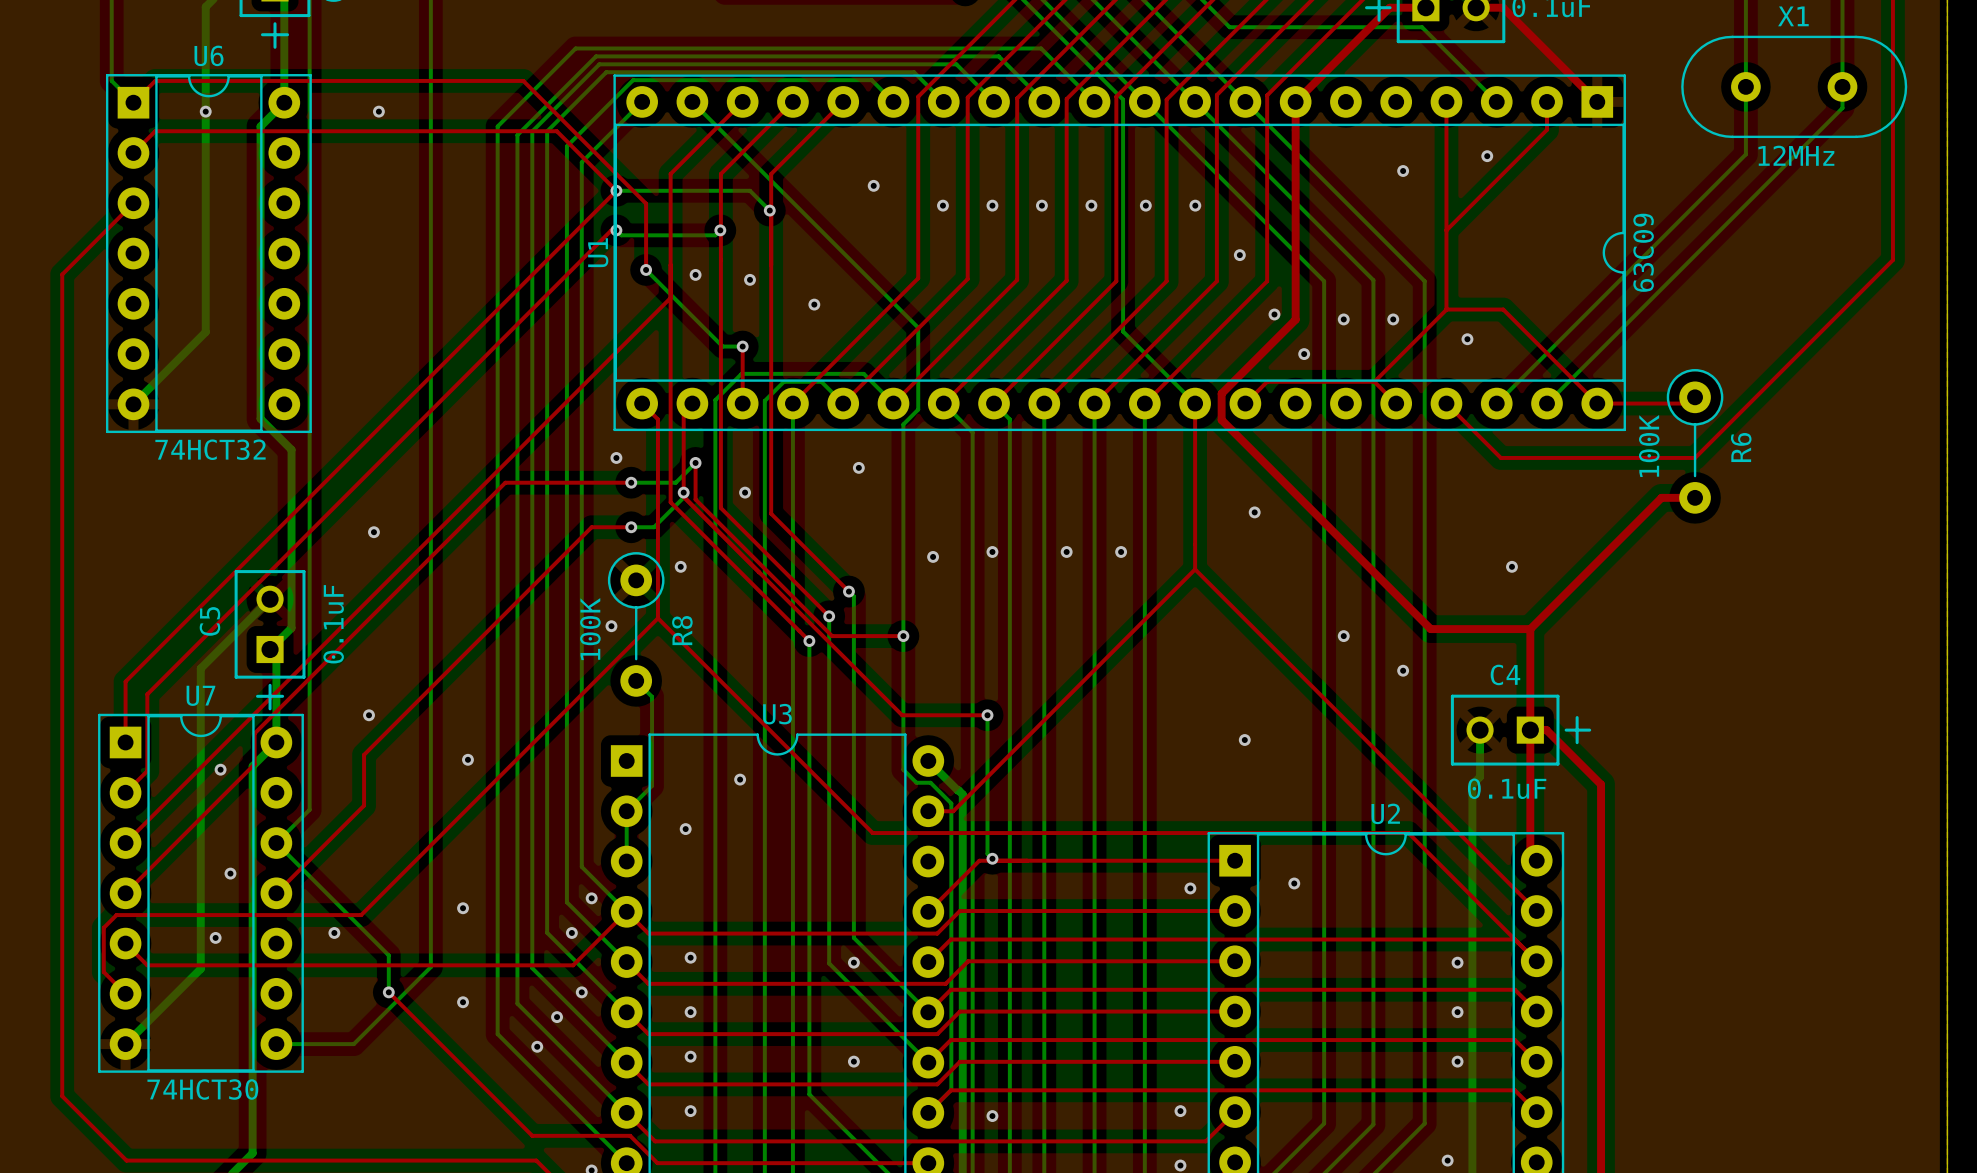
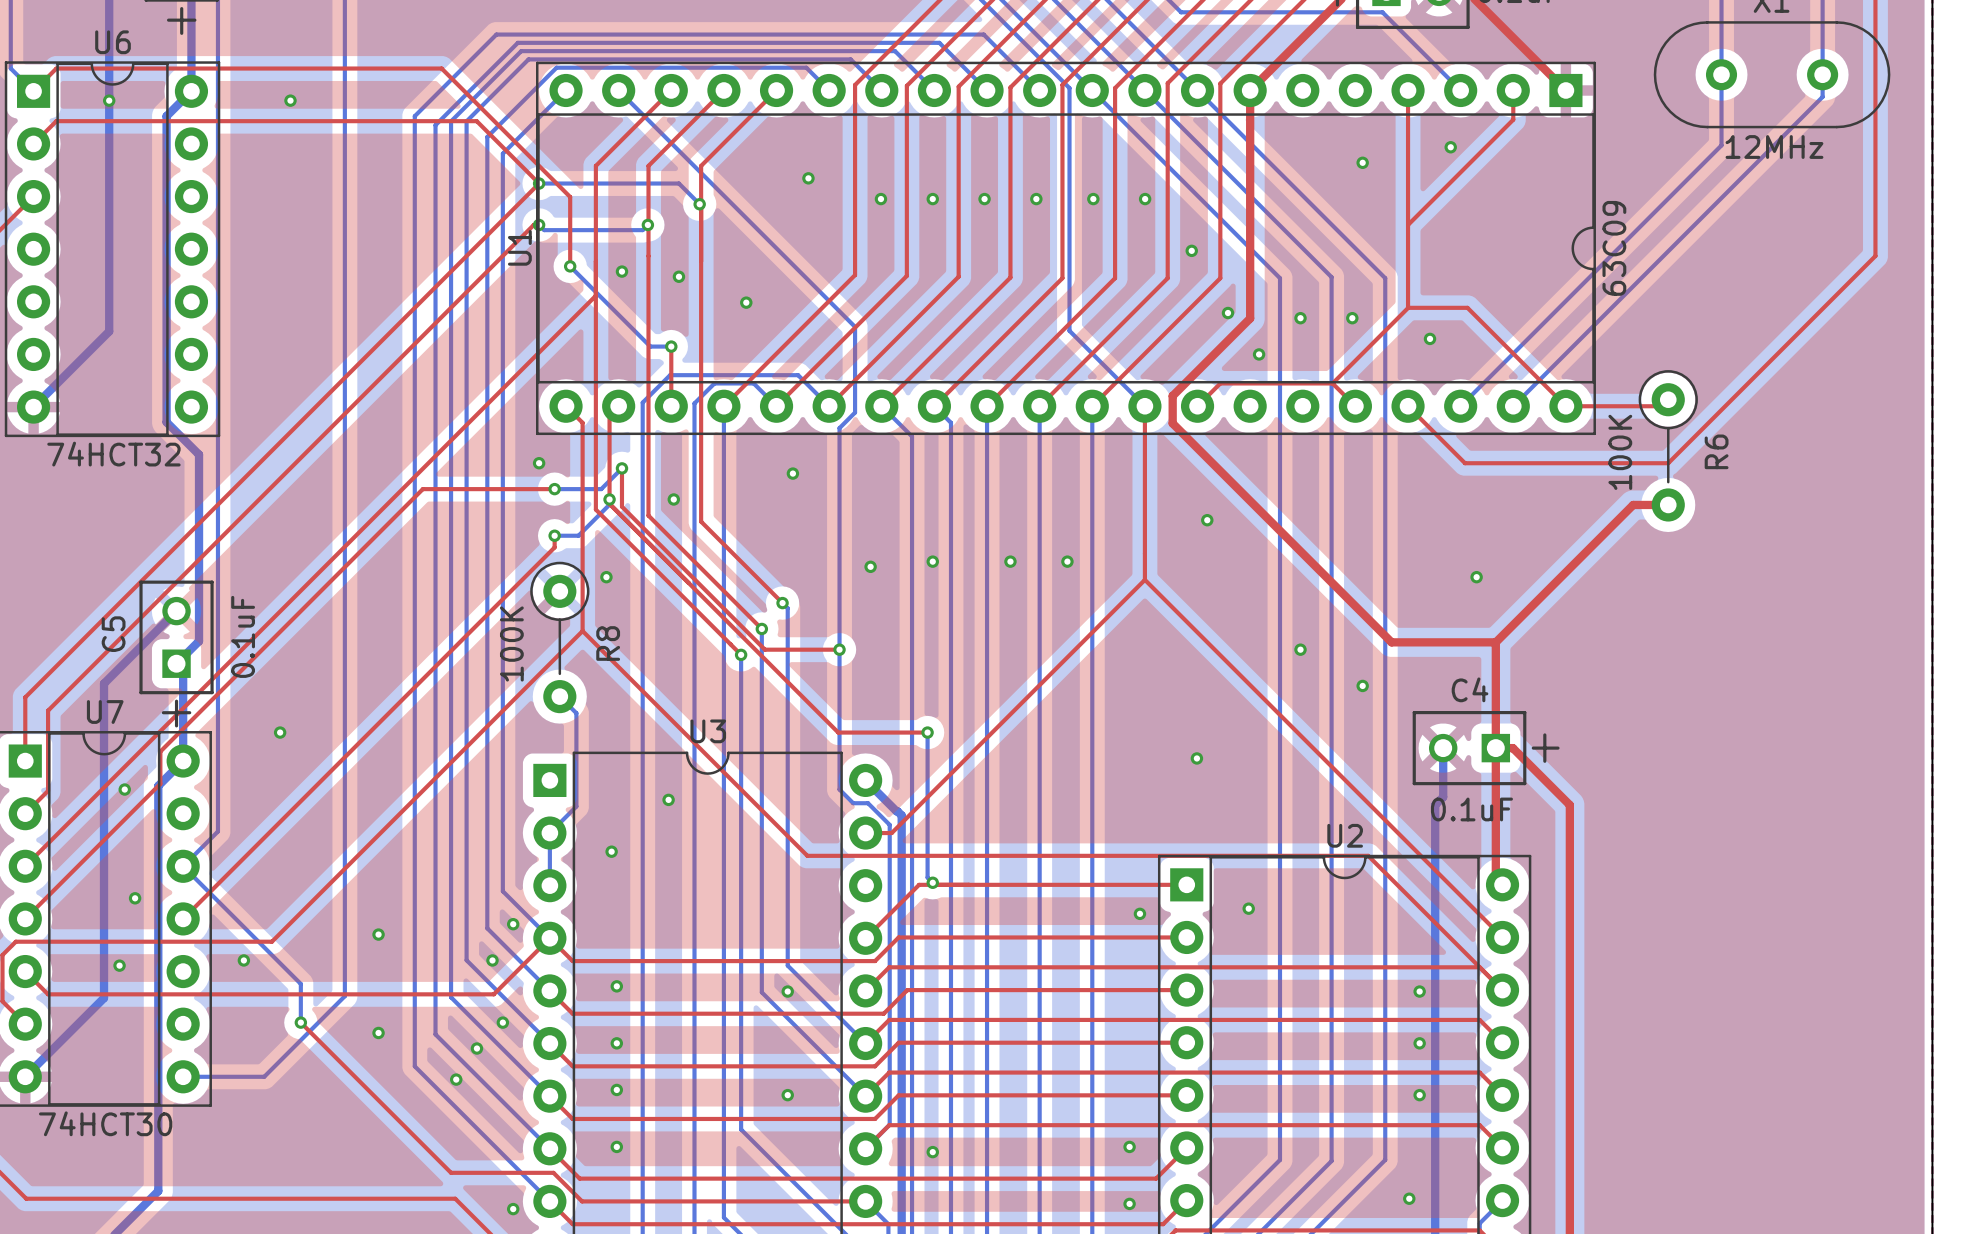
top track: (631, 527) (591, 527) (364, 754) (364, 805) -> (554, 535) (554, 547) (274, 827)
via: (373, 532) -> none
via: (611, 626) -> none
via: (467, 759) -> none

